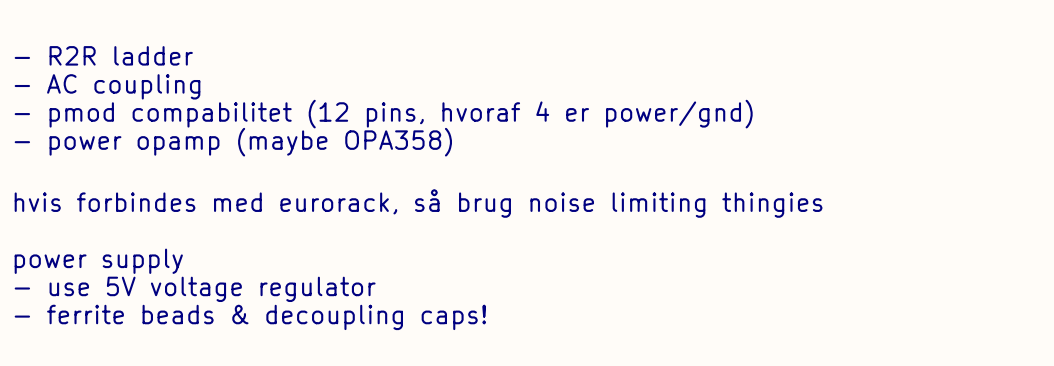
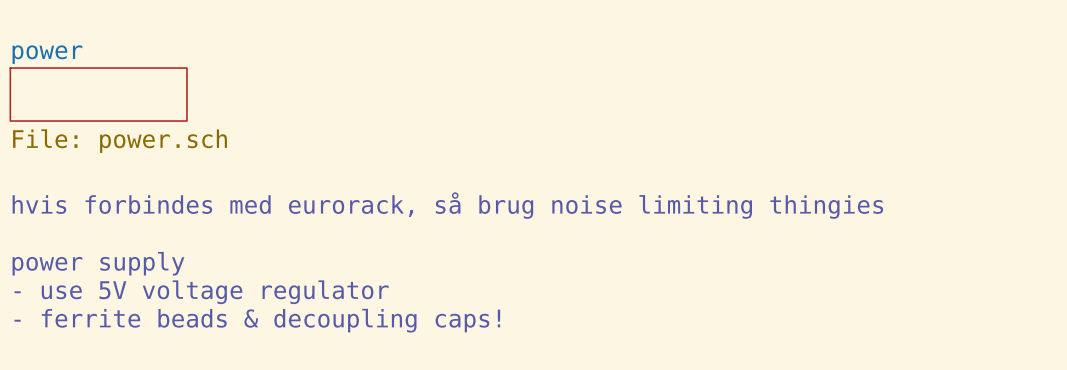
text: - R2R ladder (103, 55) -> none
text: - AC coupling (107, 86) -> none
sheet power: none -> File: power.sch (98, 94)
text: - pmod compabilitet (12 pins, hvoraf 4 er power/gnd) (383, 114) -> none
text: - power opamp (maybe OPA358) (233, 142) -> none

